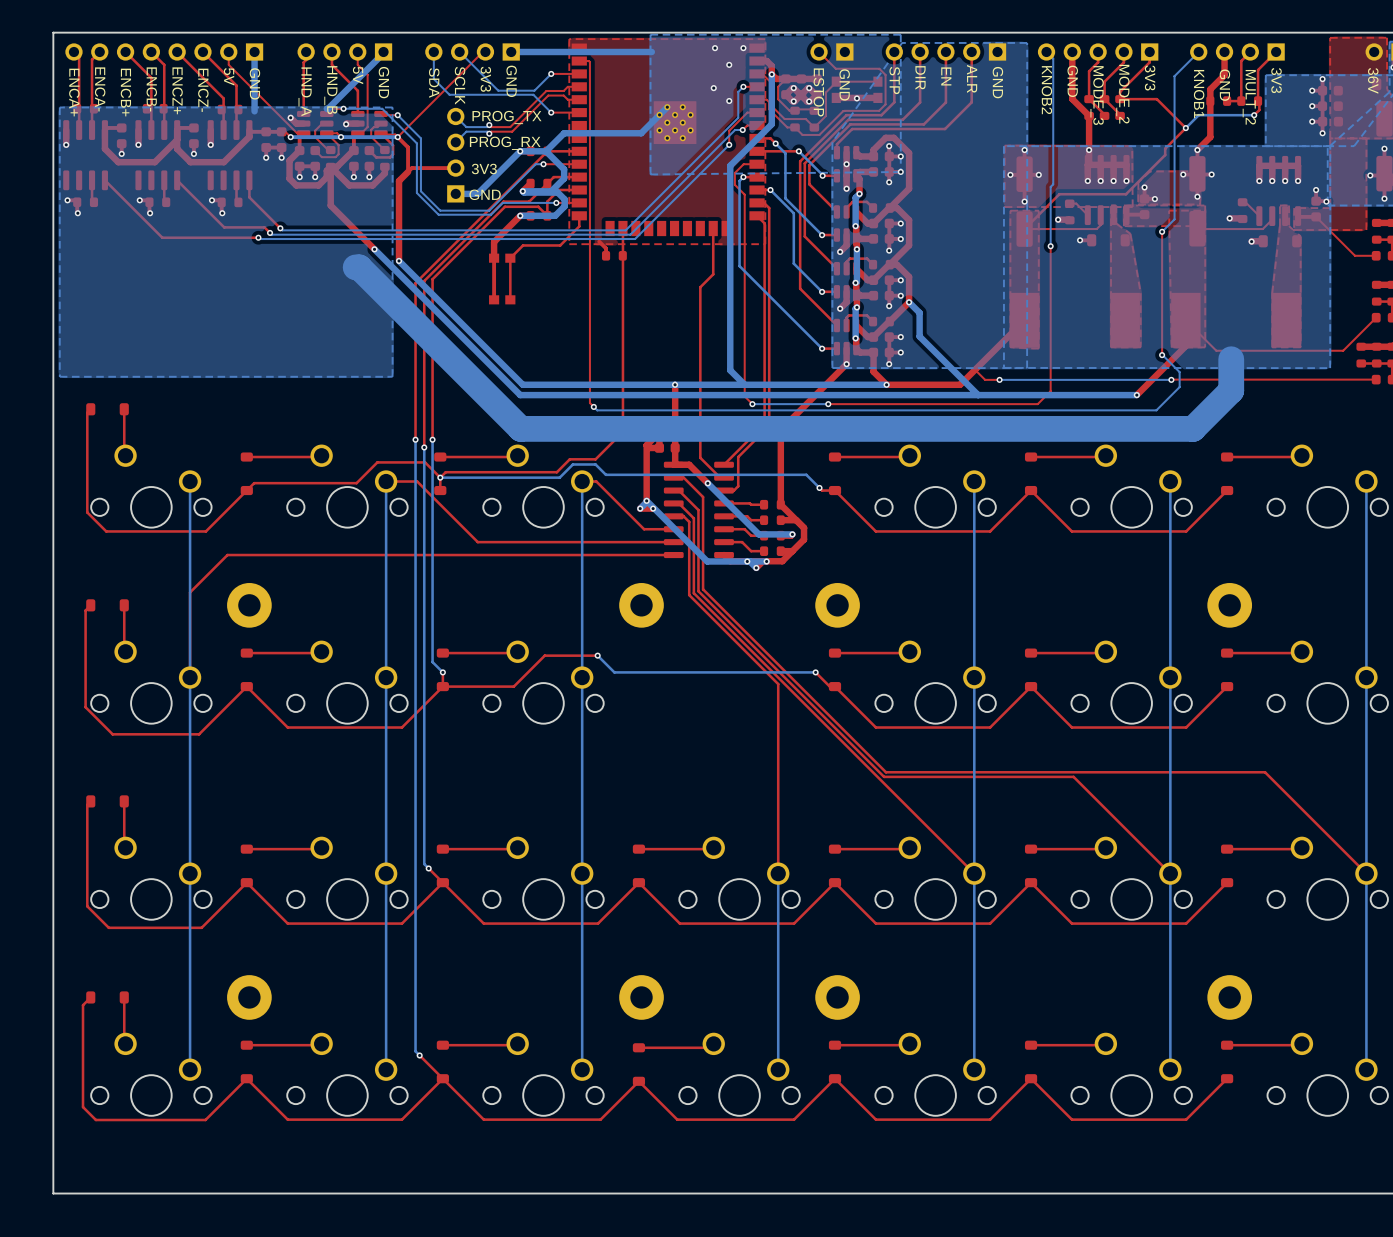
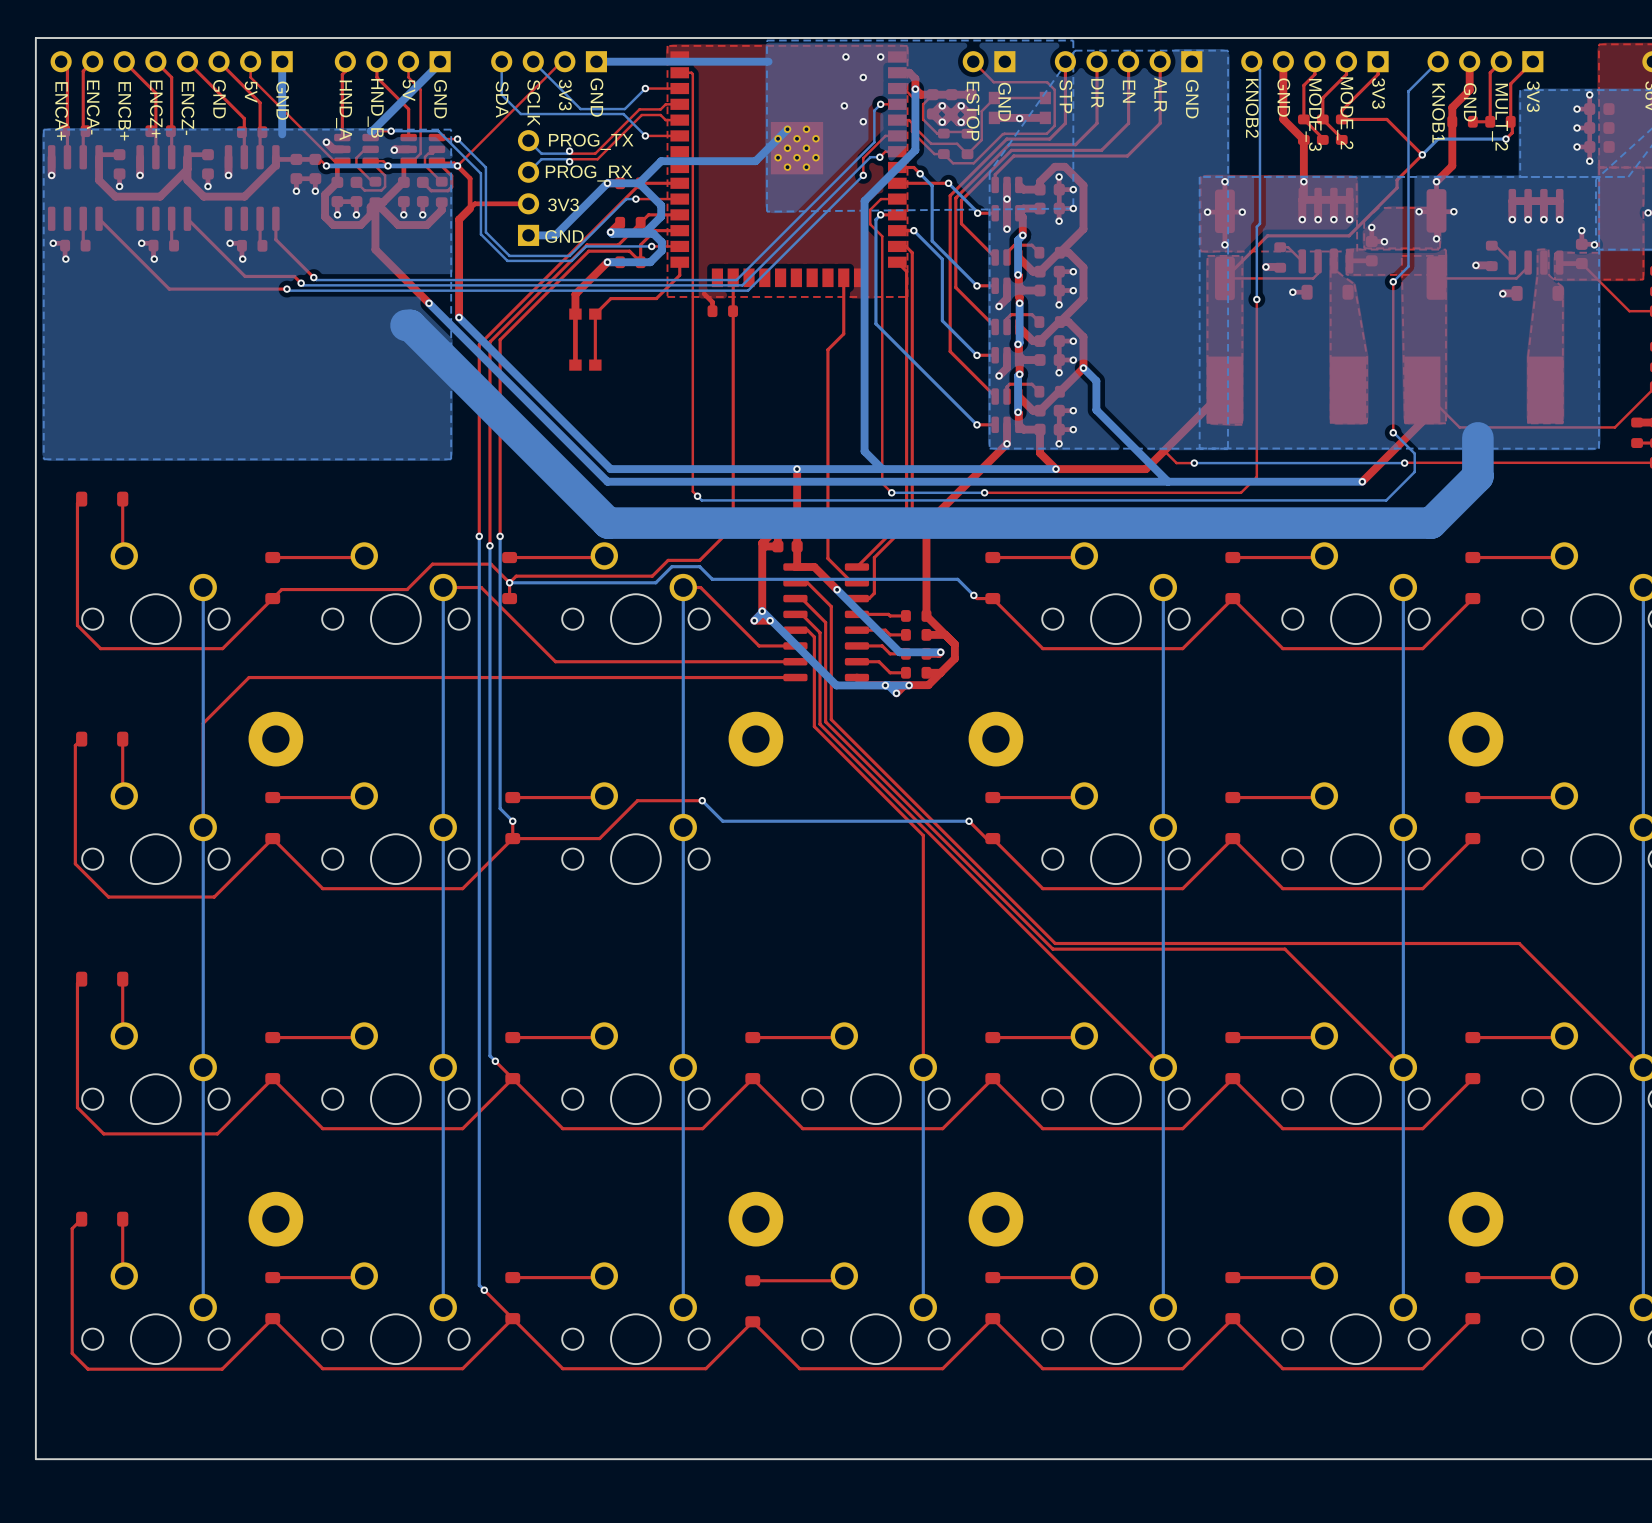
text: ENCB- (151, 89) -> ENCZ+ (156, 109)
text: ENCZ+ (177, 90) -> ENCZ- (187, 108)
text: ENCZ- (203, 90) -> GND (219, 99)

